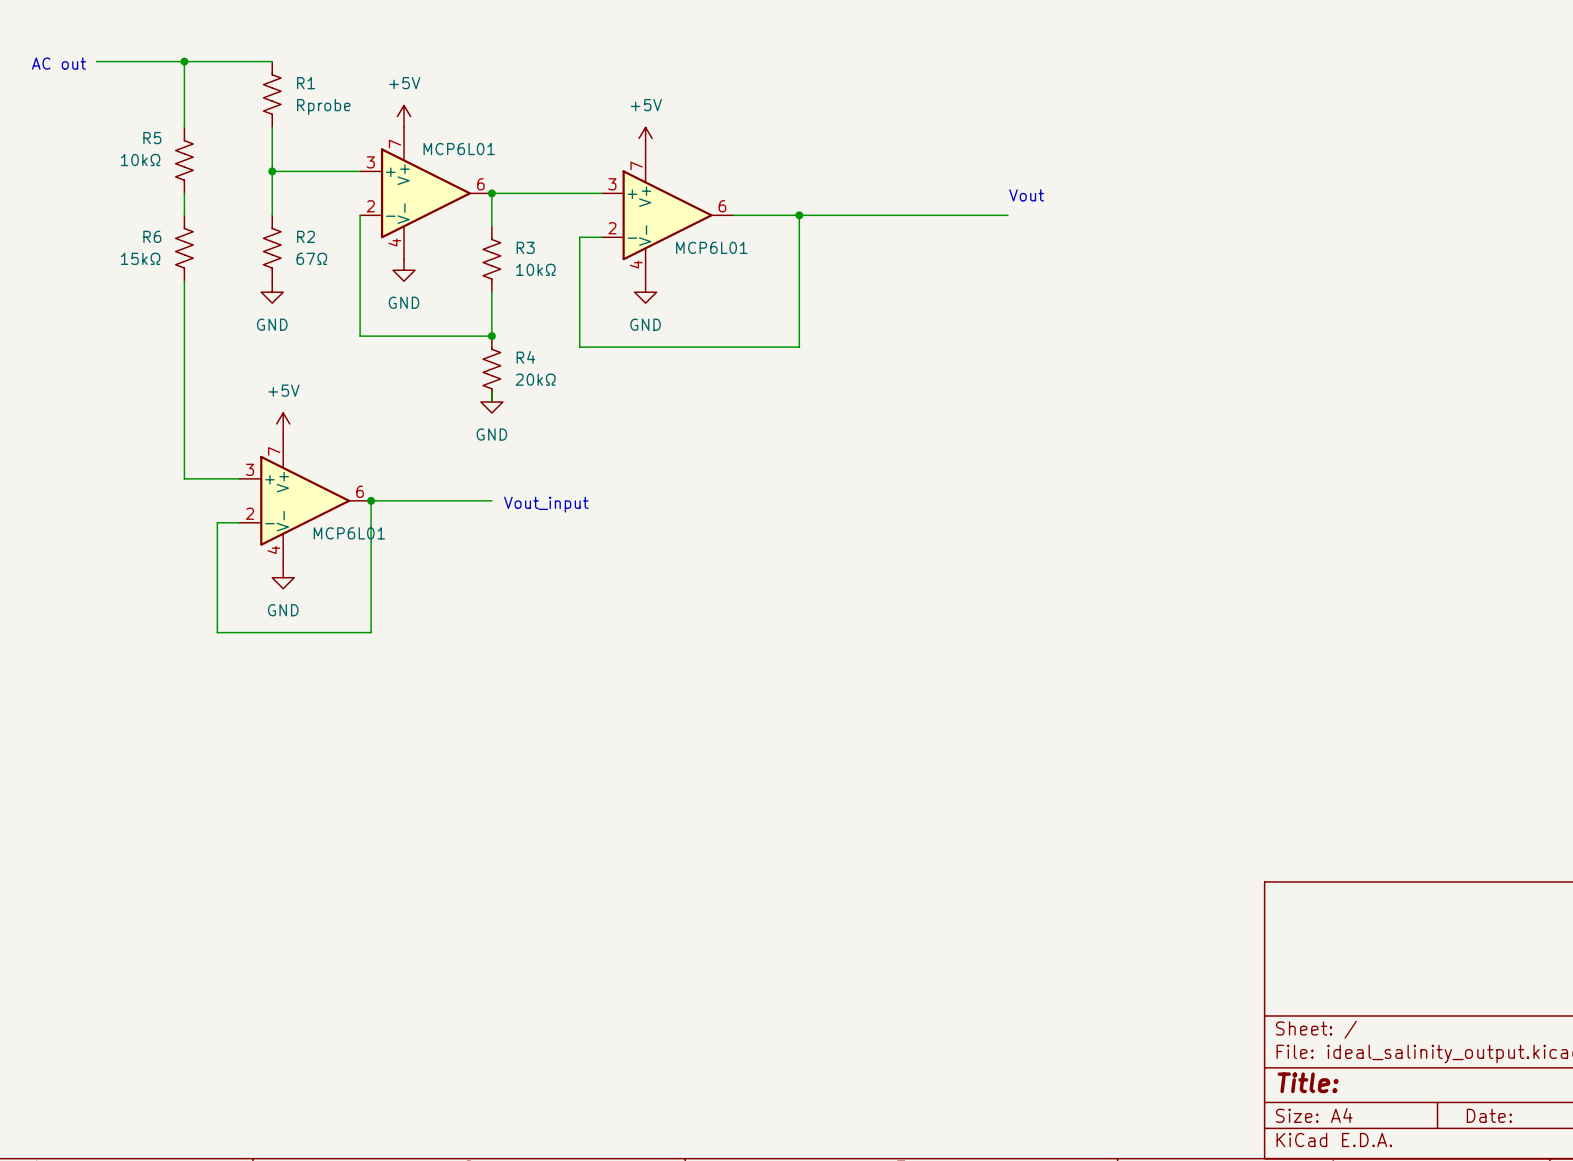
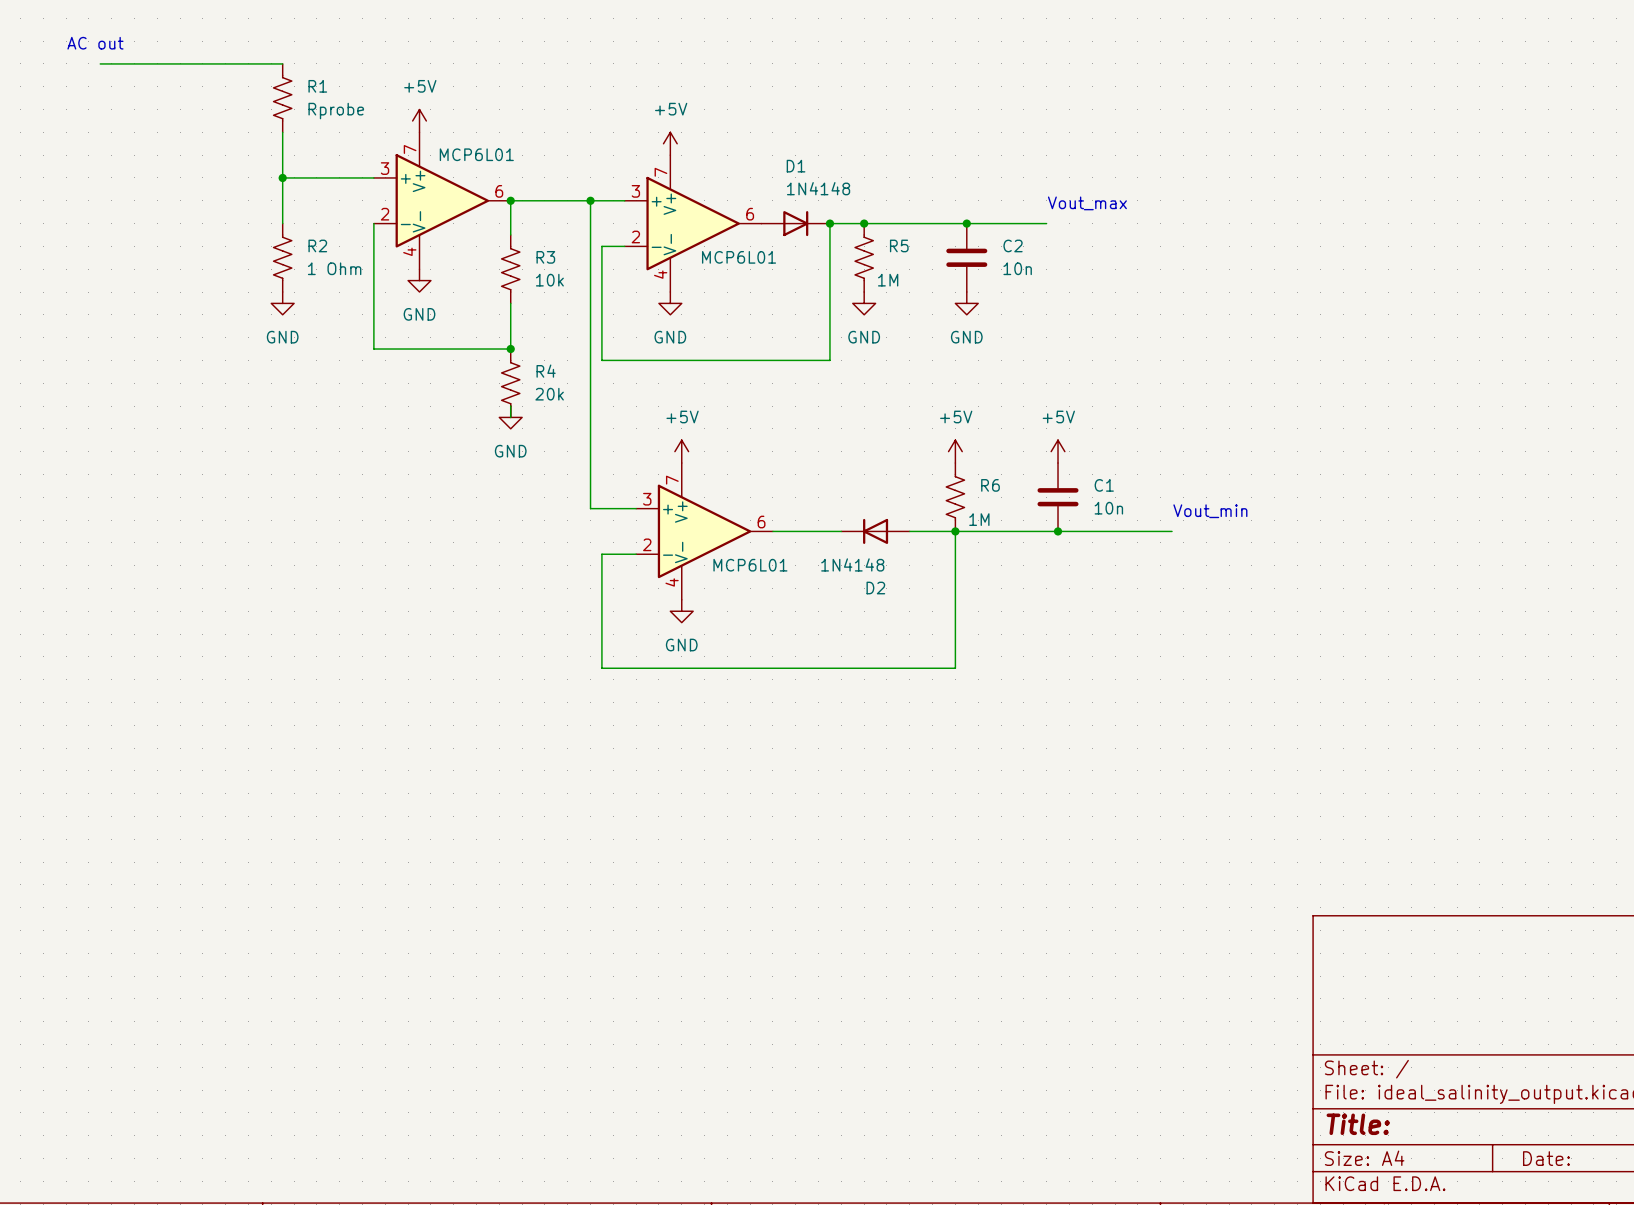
wire: (184, 61) (184, 127) -> none
junction: (184, 61) -> none
text position: AC out (58, 63) -> AC out (95, 43)
R5 name position: R5 (152, 138) -> R5 (899, 245)
R5 value: 10kΩ (140, 160) -> 1M (888, 280)
R5 position: (184, 160) -> (864, 257)
wire: (184, 193) (184, 215) -> none
wire: none -> (590, 200) (590, 508) (636, 508)
junction: none -> (590, 200)
text: Vout (1026, 195) -> Vout_max (1087, 203)
D1: none -> 1N4148 (795, 223)
junction: none -> (864, 223)
junction: none -> (966, 223)
R6 name position: R6 (152, 236) -> R6 (990, 485)
R6 position: (184, 248) -> (955, 497)
C2: none -> 10n (966, 257)
R6 value: 15kΩ (140, 258) -> 1M (979, 519)
R2 value: 67Ω (311, 258) -> 1 Ohm (334, 268)
R3 value: 10kΩ (535, 269) -> 10k (549, 280)
wire: (184, 281) (184, 478) (239, 478) -> none
power symbol: none -> GND (864, 303)
power symbol: none -> GND (966, 303)
R4 value: 20kΩ (535, 379) -> 20k (549, 394)
power symbol: +5V (283, 423) -> none
power symbol: none -> +5V (681, 451)
power symbol: none -> +5V (955, 451)
power symbol: none -> +5V (1058, 451)
C1: none -> 10n (1058, 497)
text: none -> Vout_min (1210, 511)
part: MCP6L01 (305, 500) -> none
junction: (371, 500) -> none
wire: (491, 500) (371, 500) (371, 632) (217, 632) (217, 522) (239, 522) -> none
text: Vout_input (546, 504) -> none
part: none -> MCP6L01 (704, 531)
wire: none -> (772, 531) (841, 531)
D2: none -> 1N4148 (875, 531)
wire: none -> (909, 531) (1172, 531)
wire: none -> (955, 531) (955, 668) (601, 668) (601, 554) (636, 554)
junction: none -> (955, 531)
junction: none -> (1058, 531)
power symbol: GND (283, 577) -> none
power symbol: none -> GND (681, 611)

